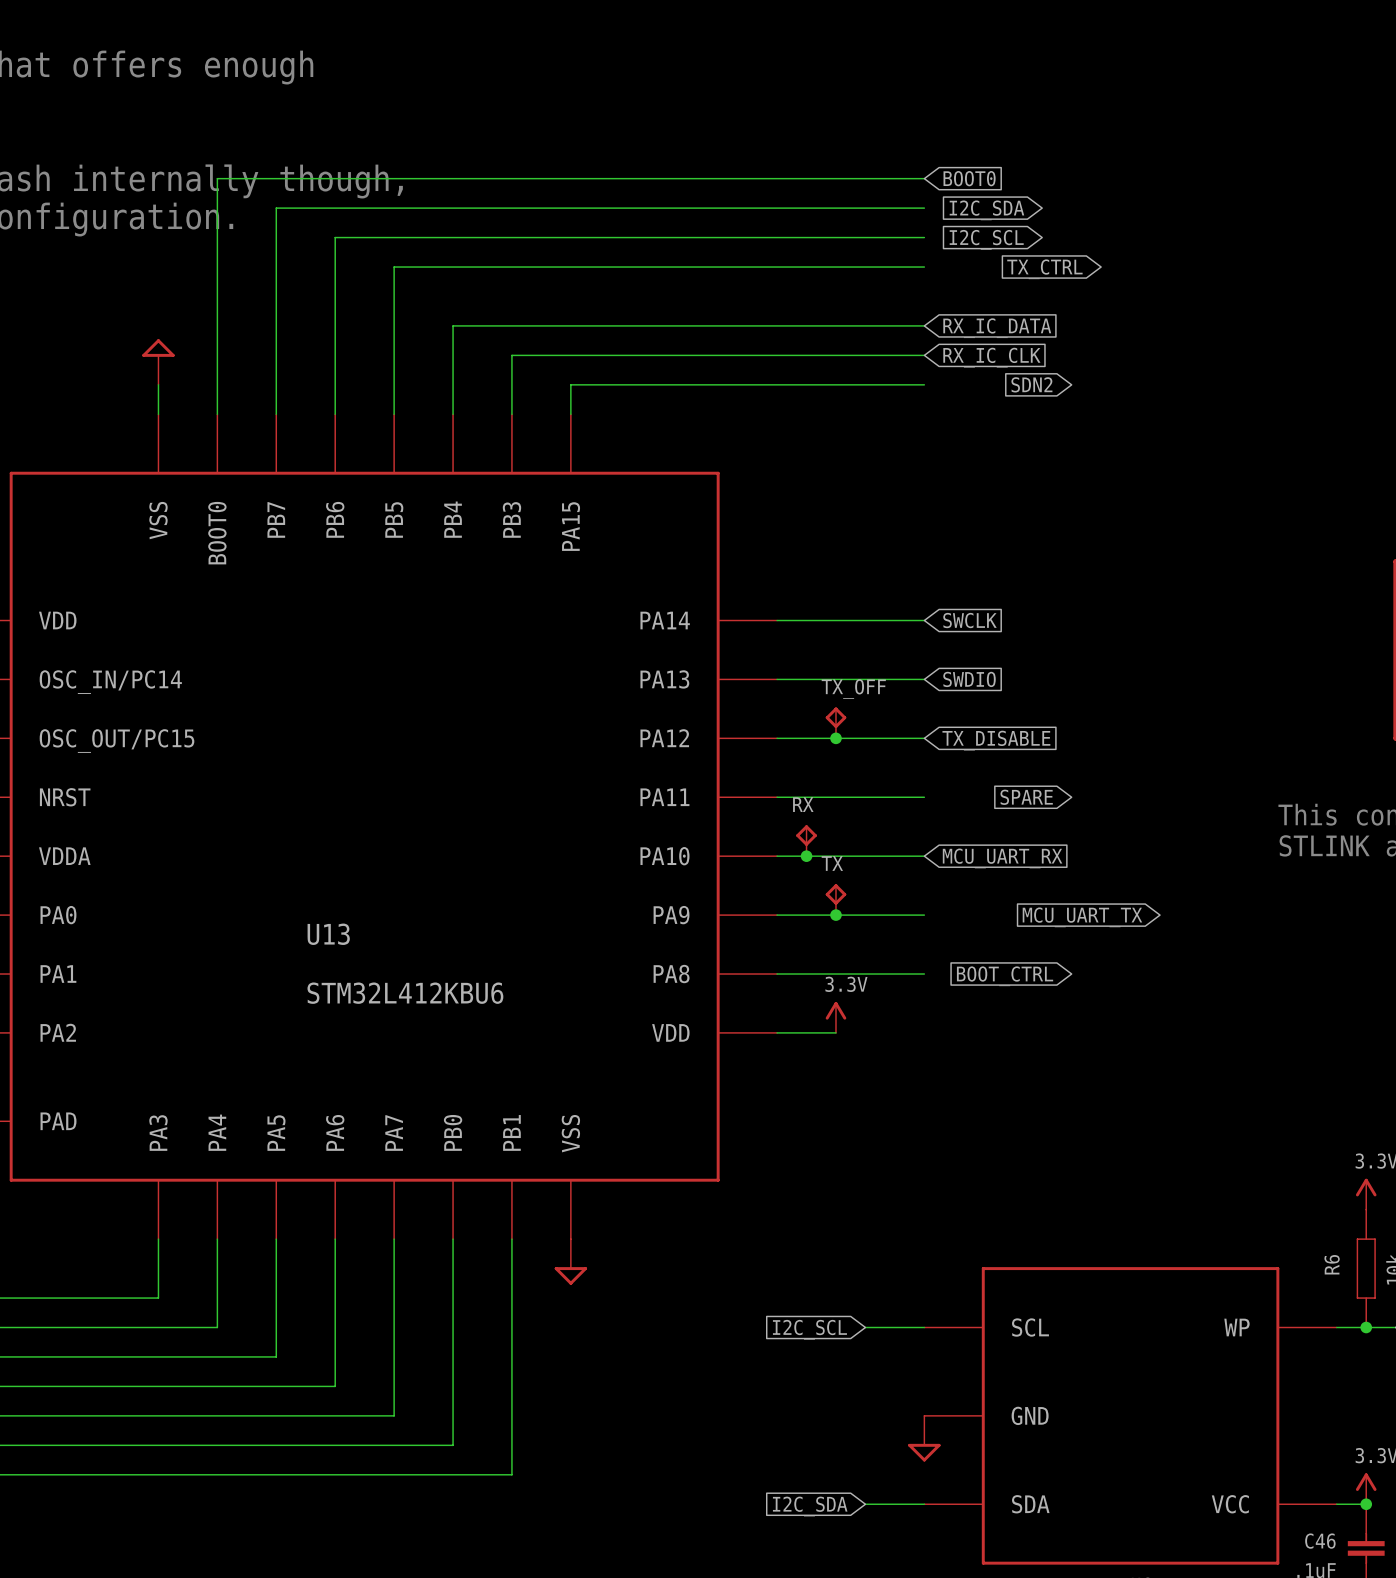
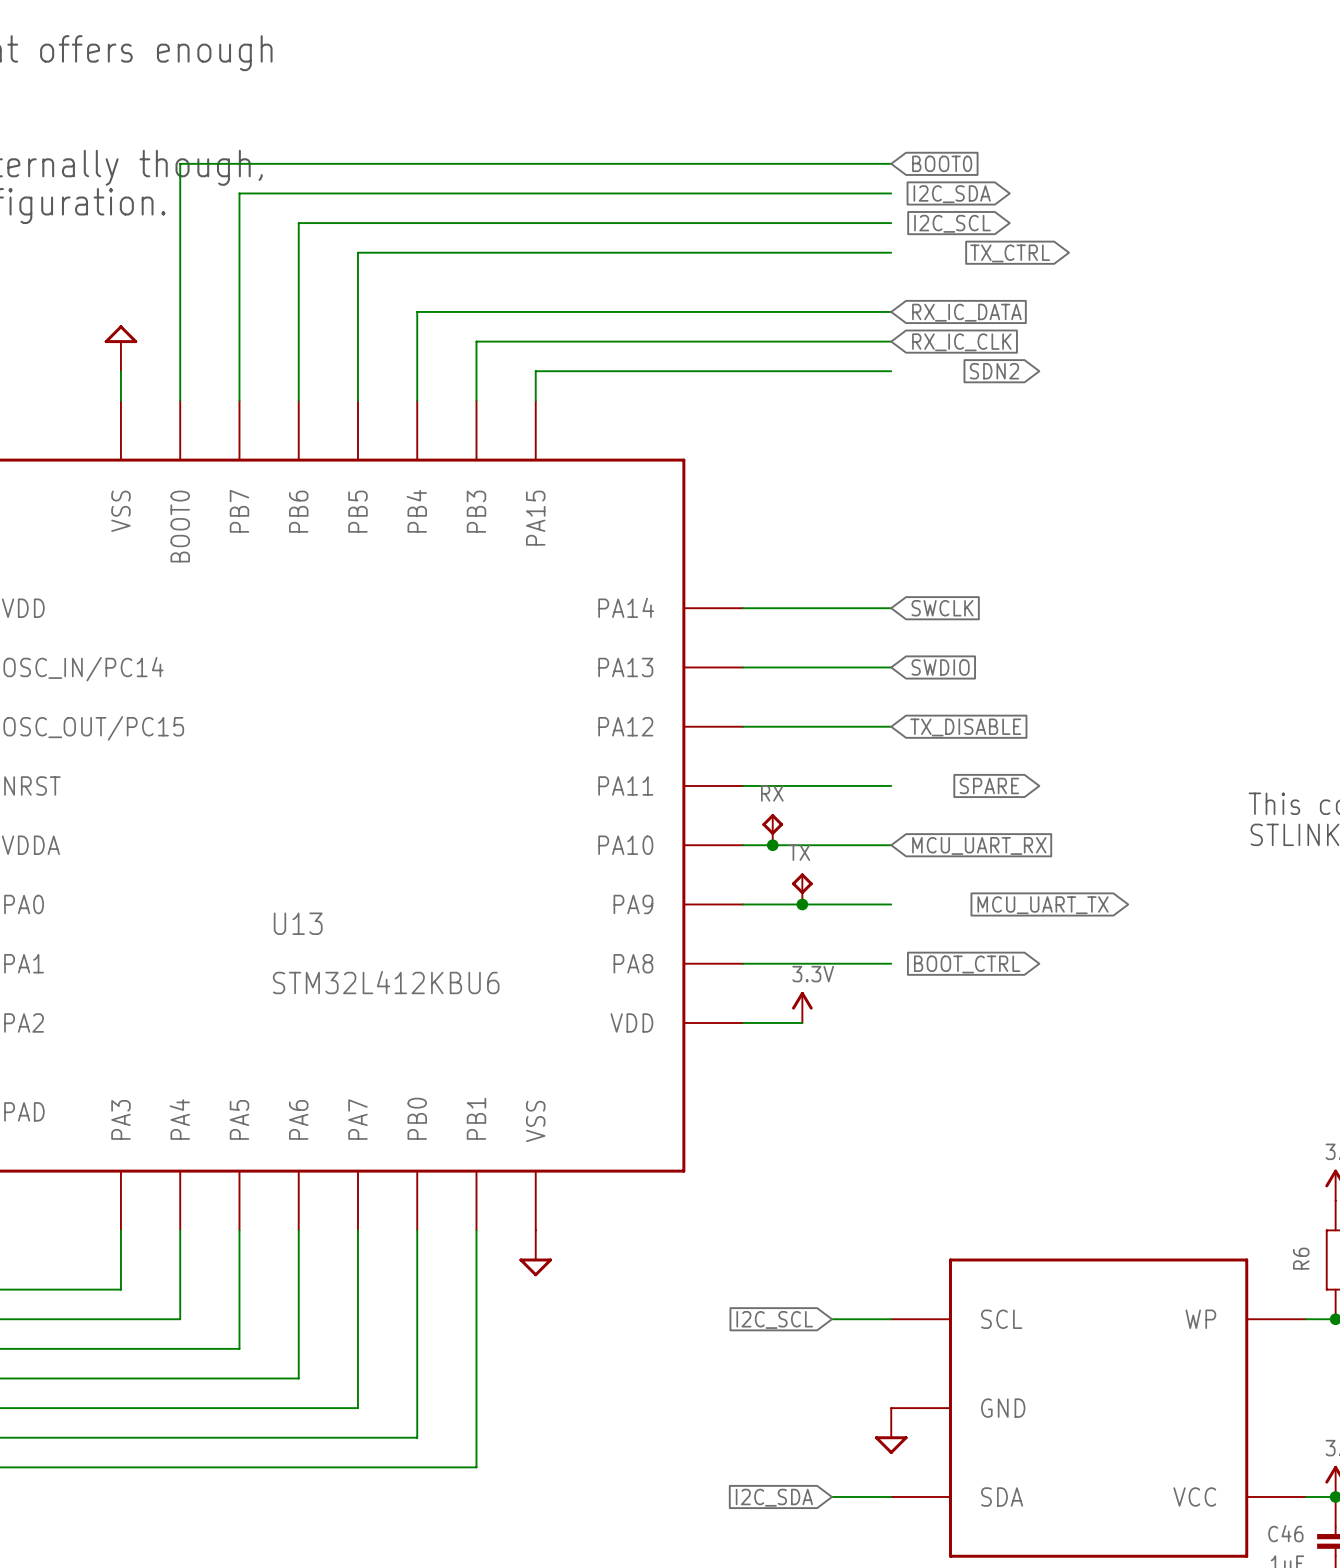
TX_OFF: (835, 722) -> none
junction: (835, 738) -> none

